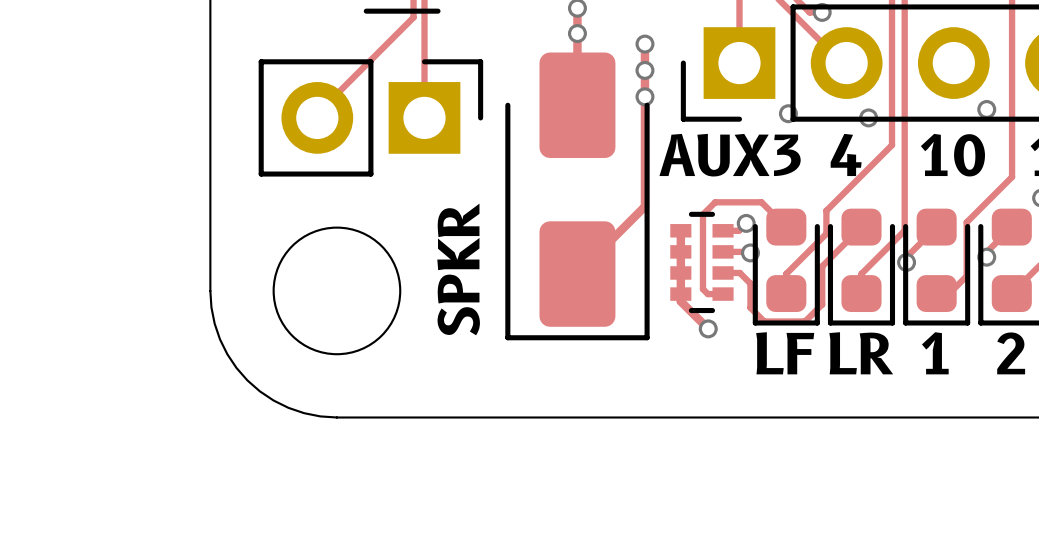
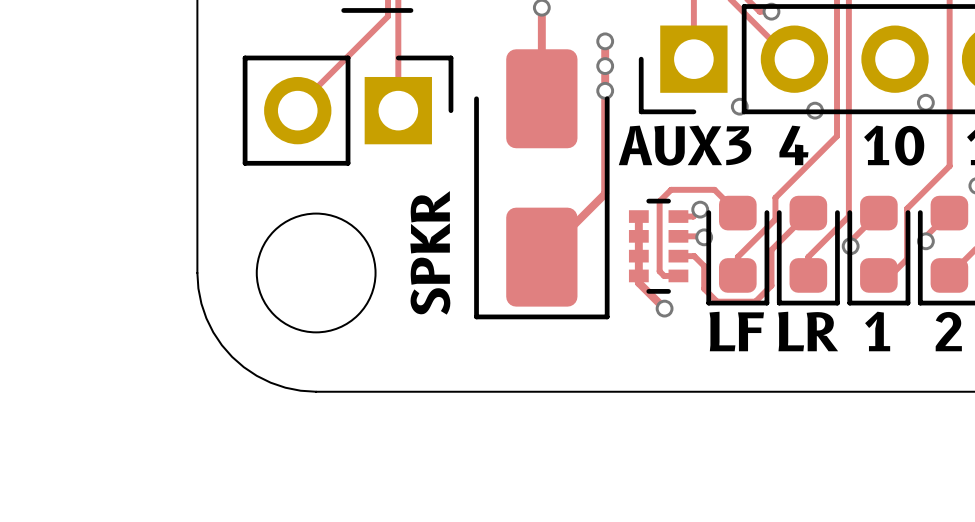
via: (577, 33) -> none

